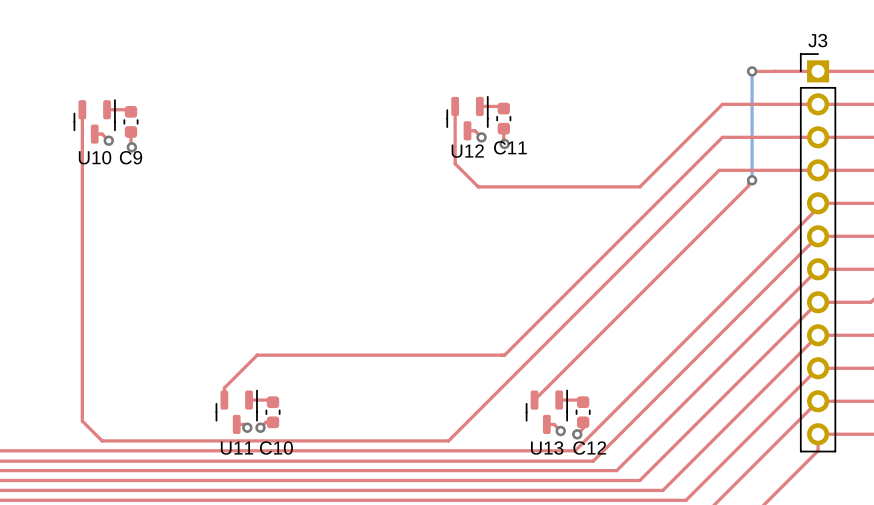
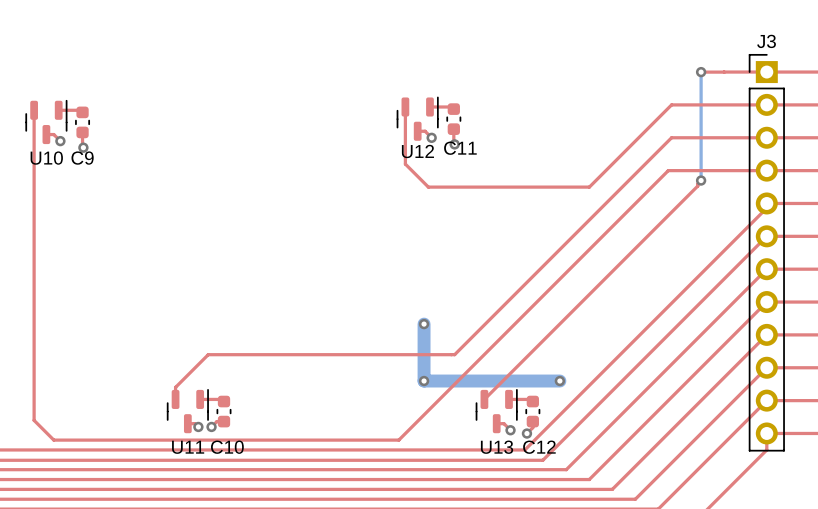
bottom track: none -> (424, 324) (424, 381) (559, 381)
via: none -> (424, 324)
via: none -> (424, 381)
via: none -> (559, 381)

